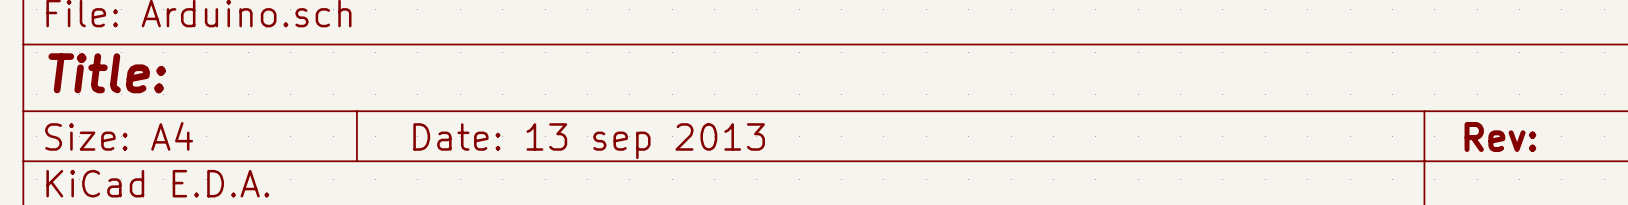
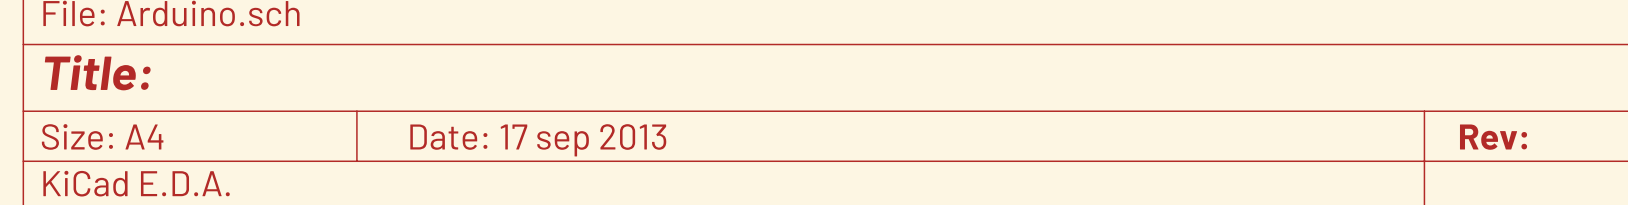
title block: Date: 13 sep 2013 (589, 141) -> Date: 17 sep 2013 (538, 140)

